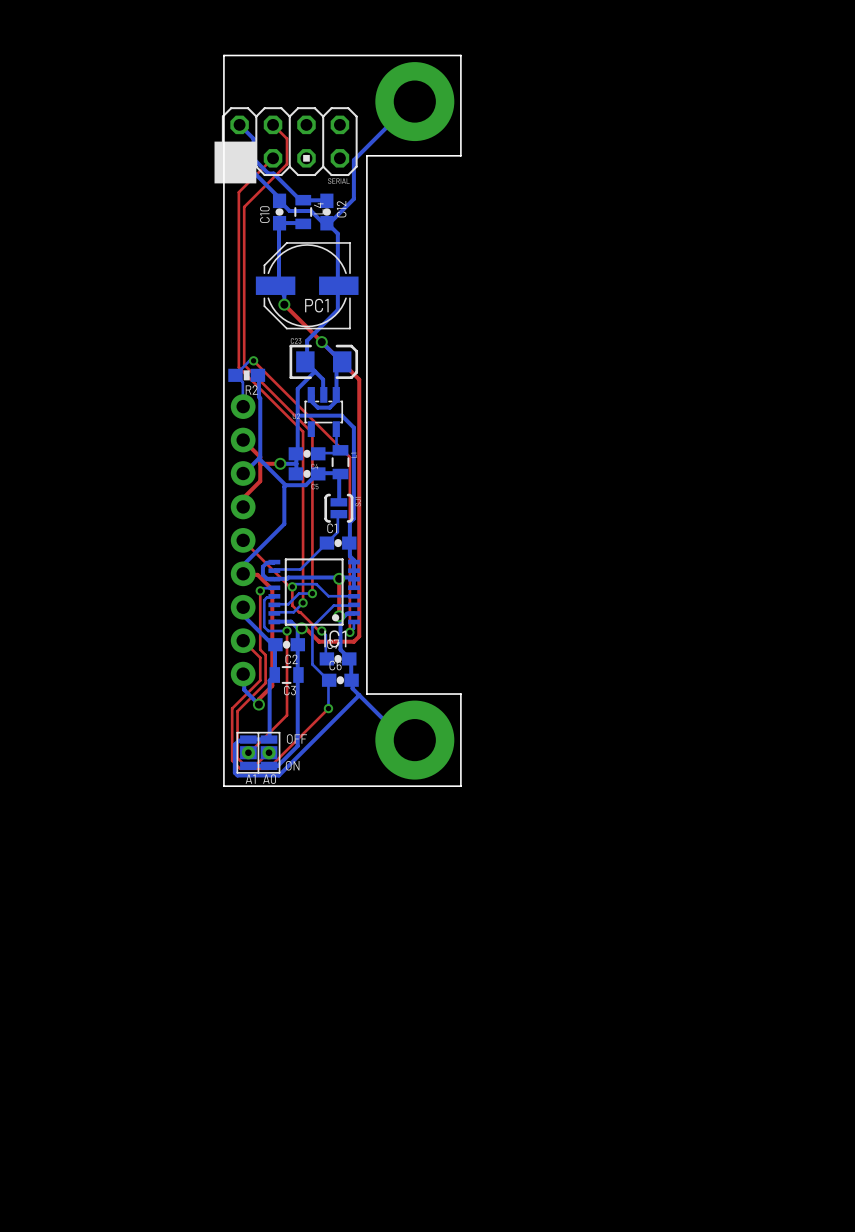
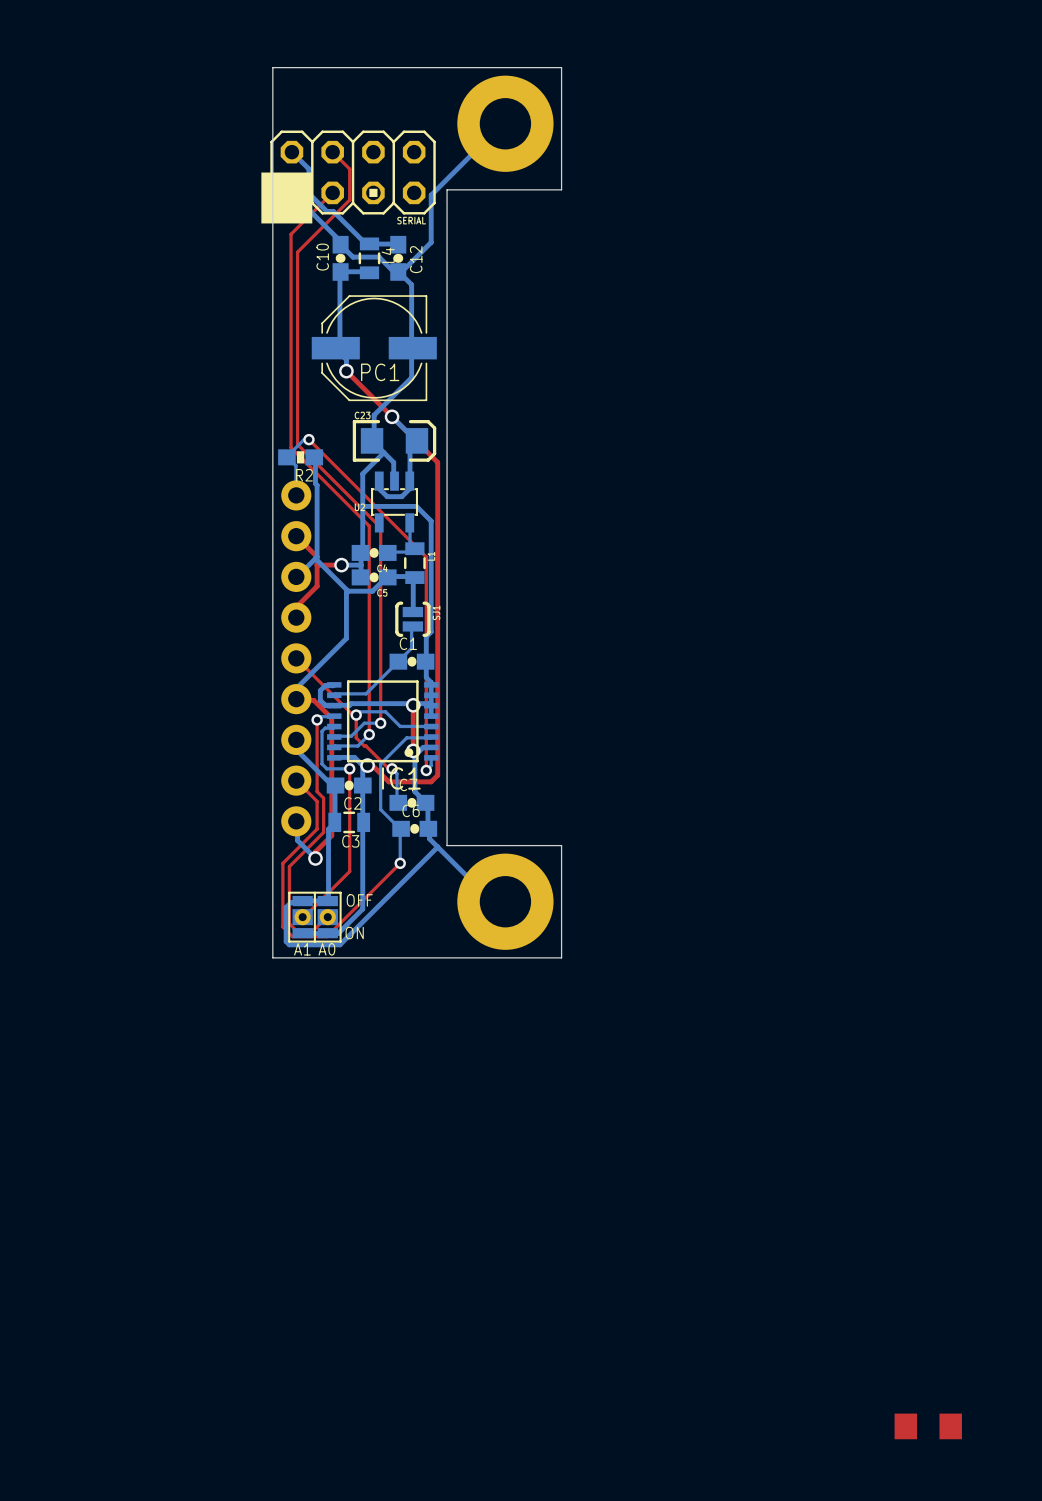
part: none -> (928, 1426)

